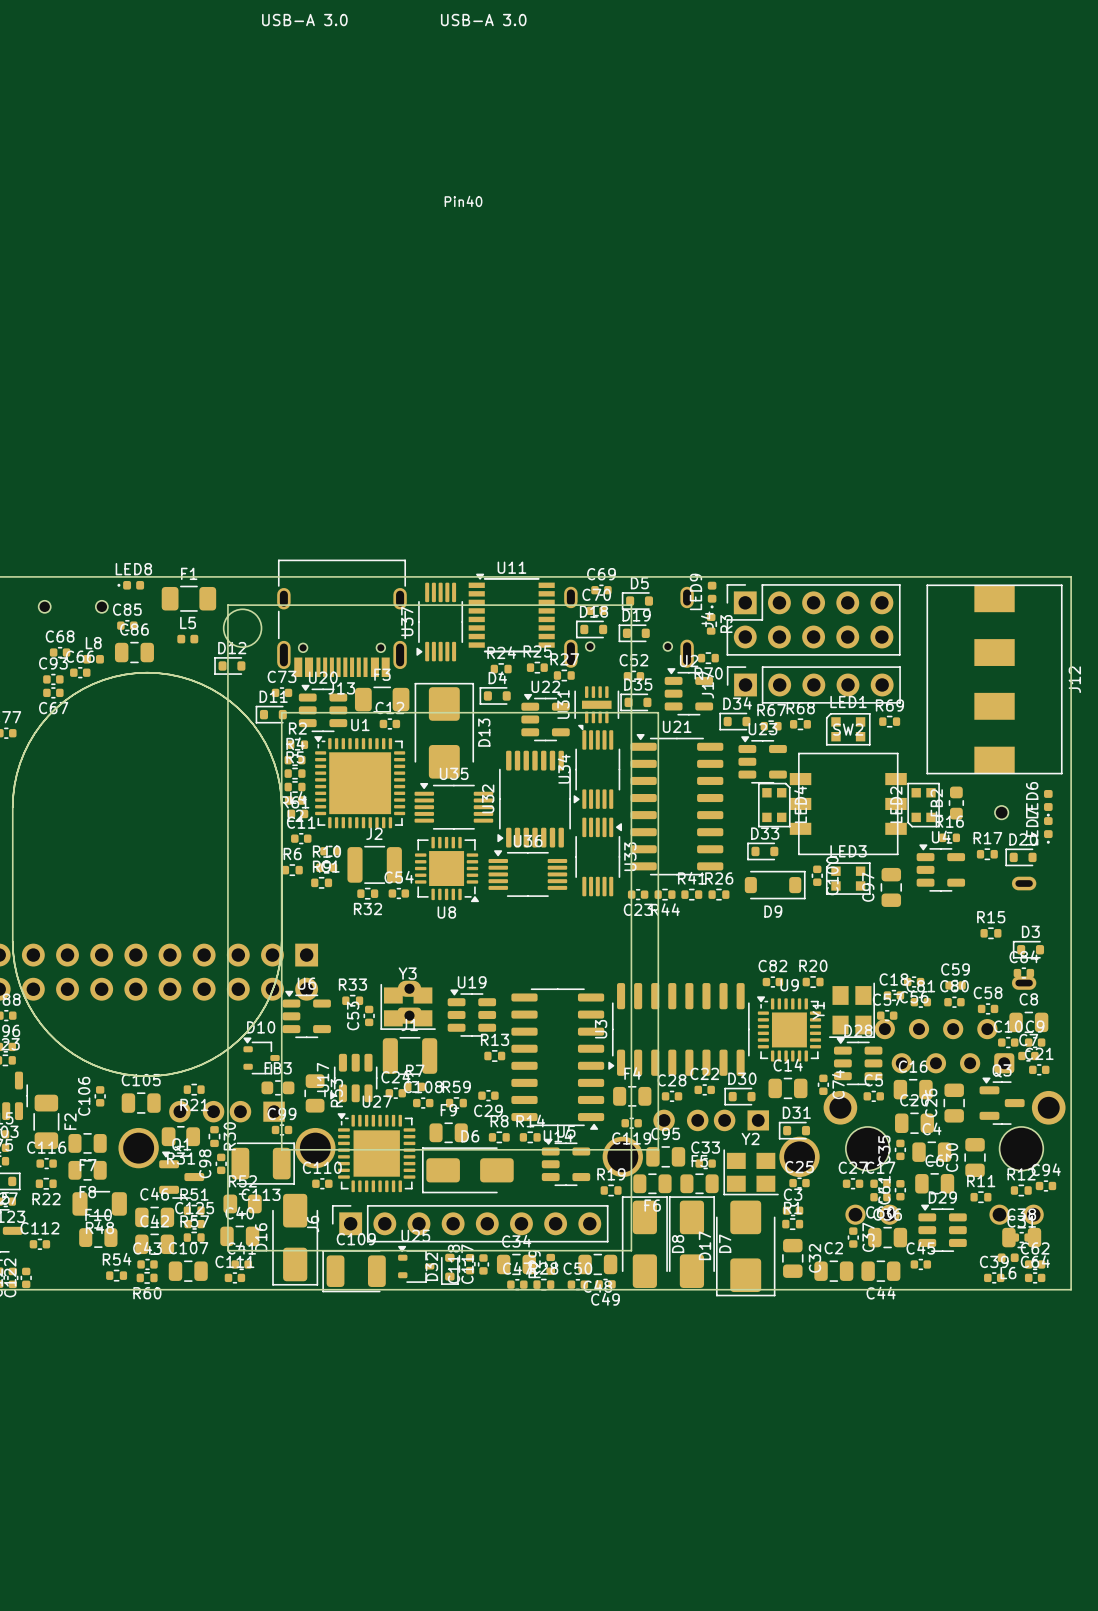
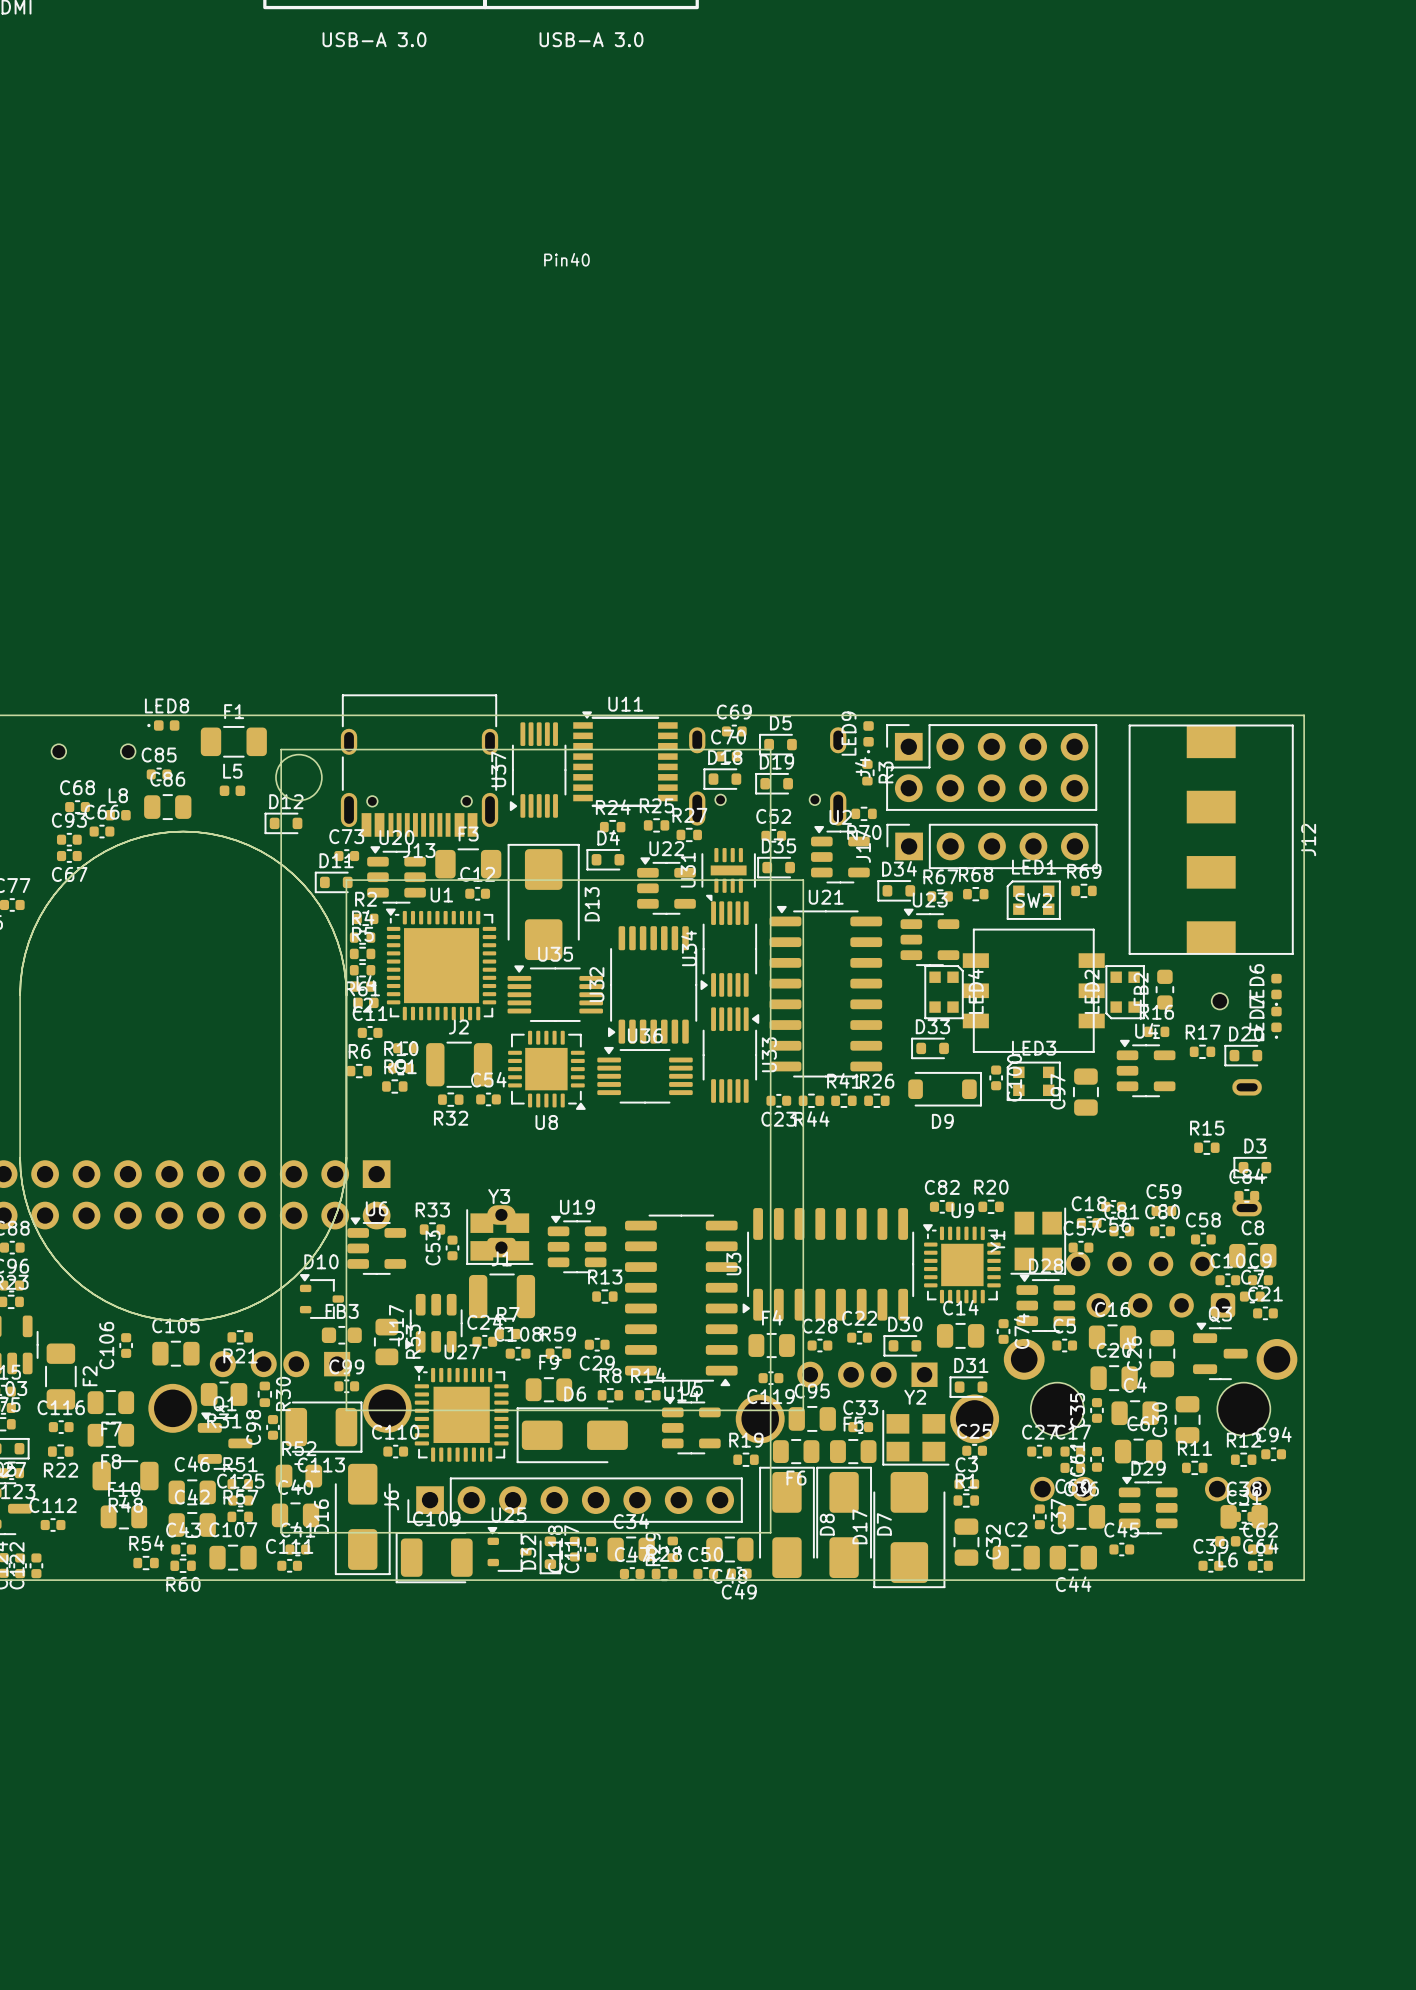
J6 footprint: [331, 1205, 609, 1243] -> [407, 1477, 743, 1523]

